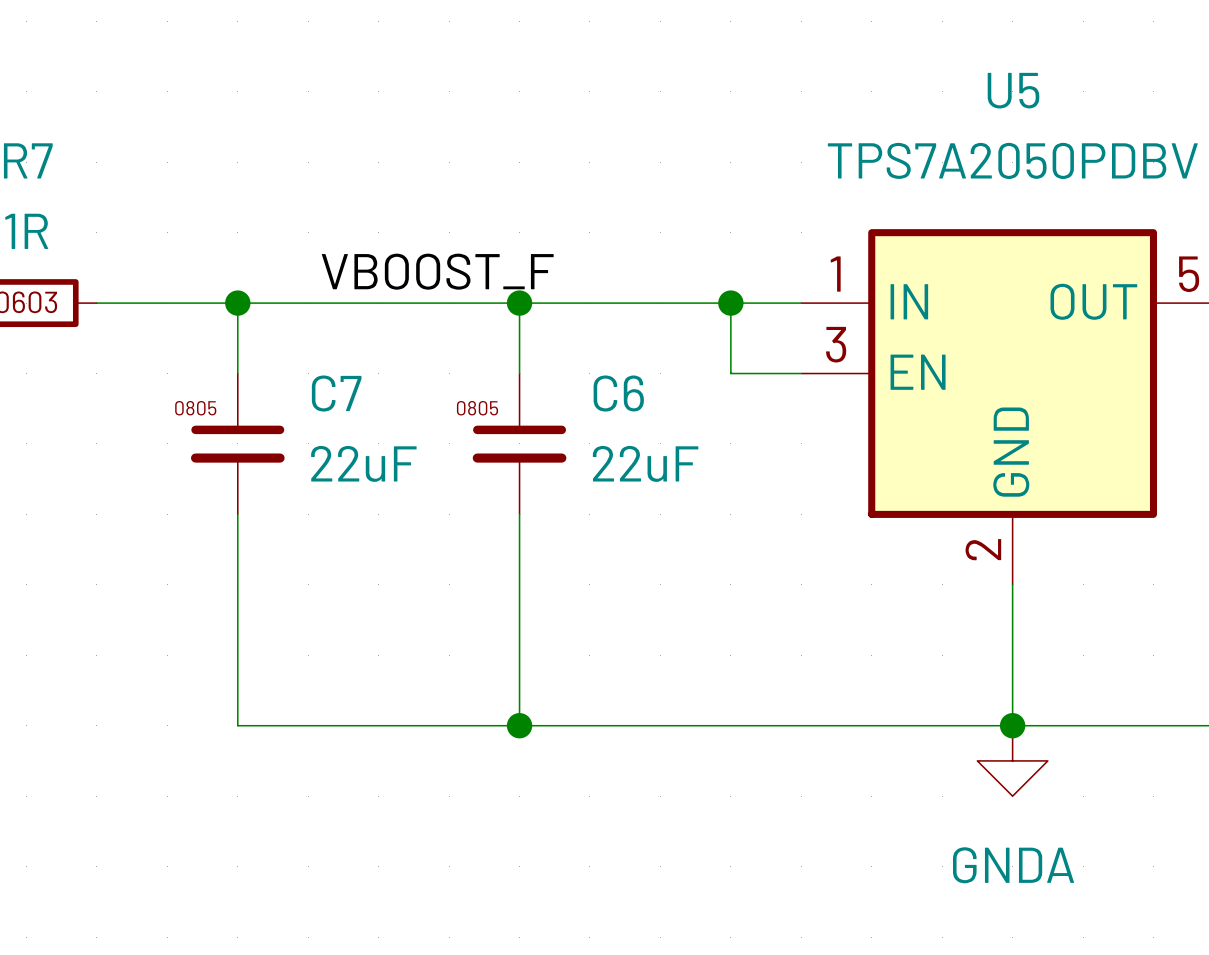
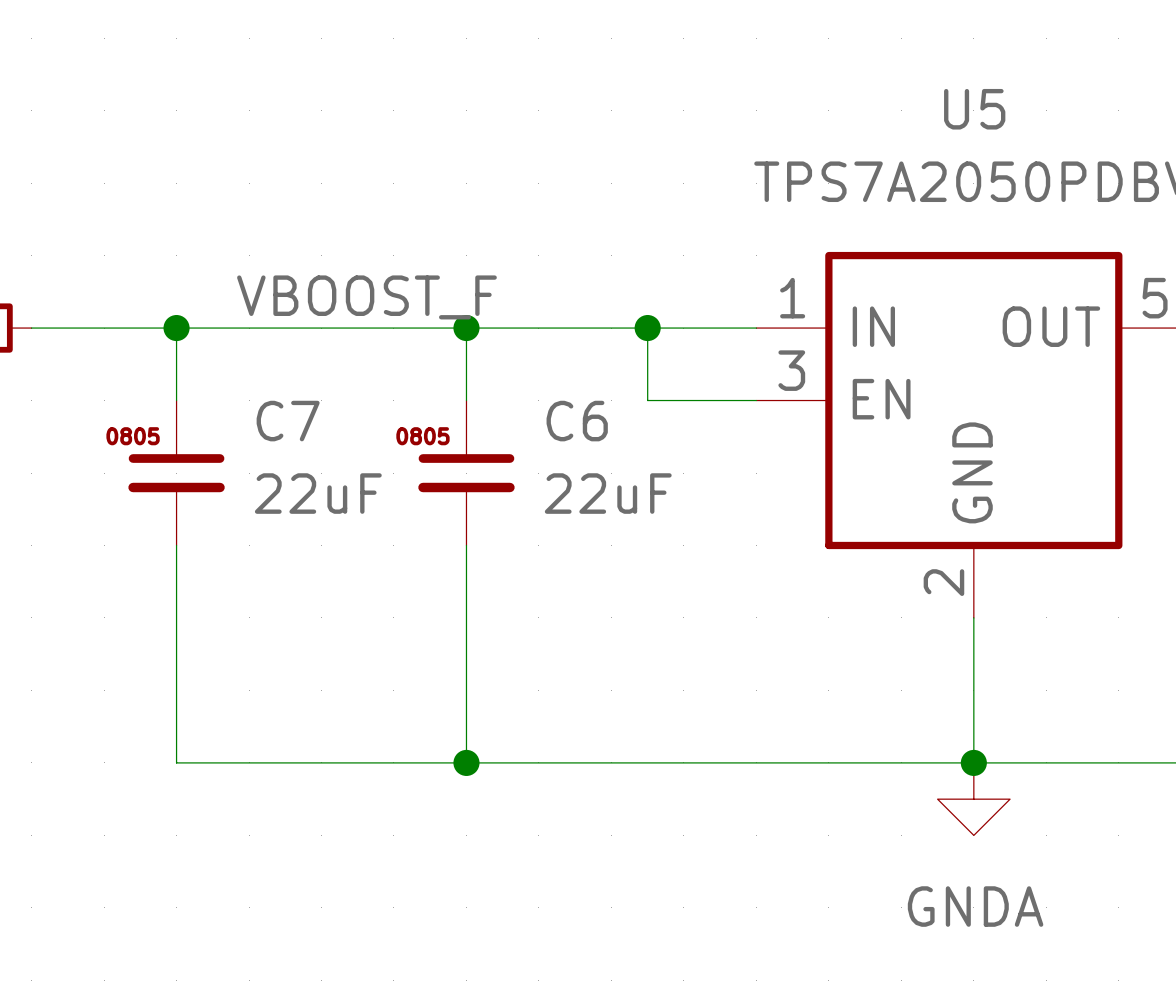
wire: (730, 303) (730, 373) -> (647, 328) (647, 400) (683, 400)
junction position: (730, 303) -> (647, 328)

